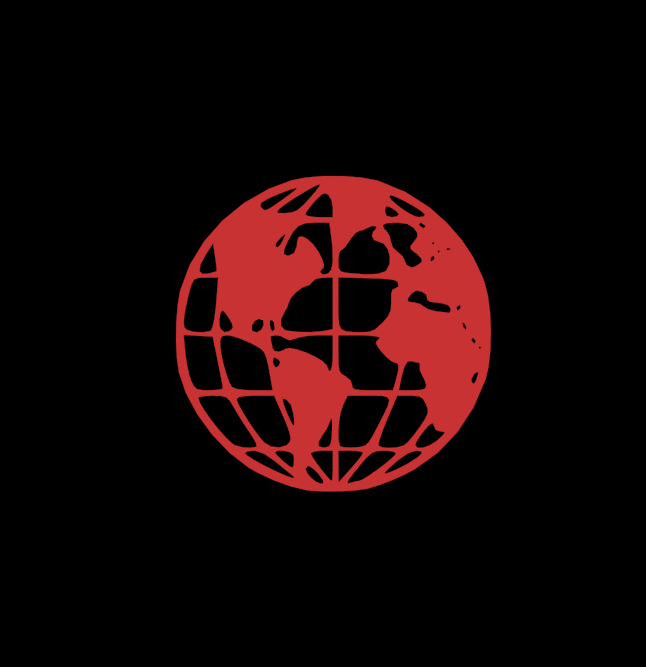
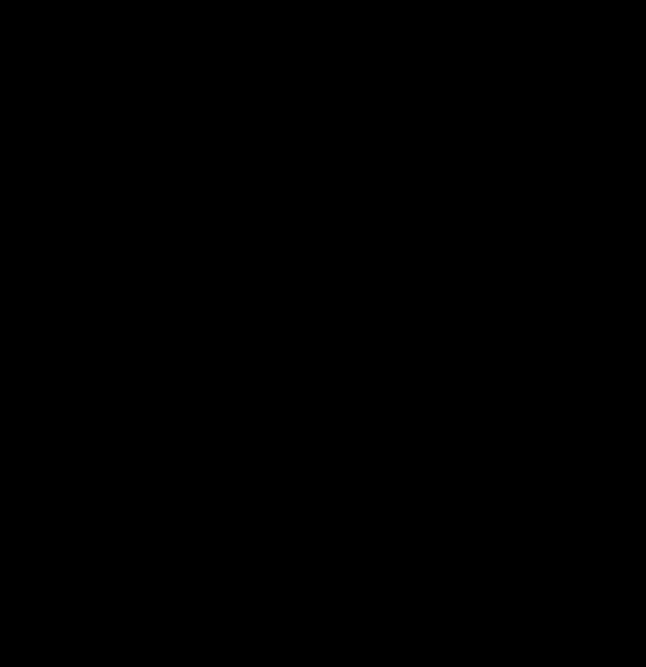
part: (333, 333) -> none

